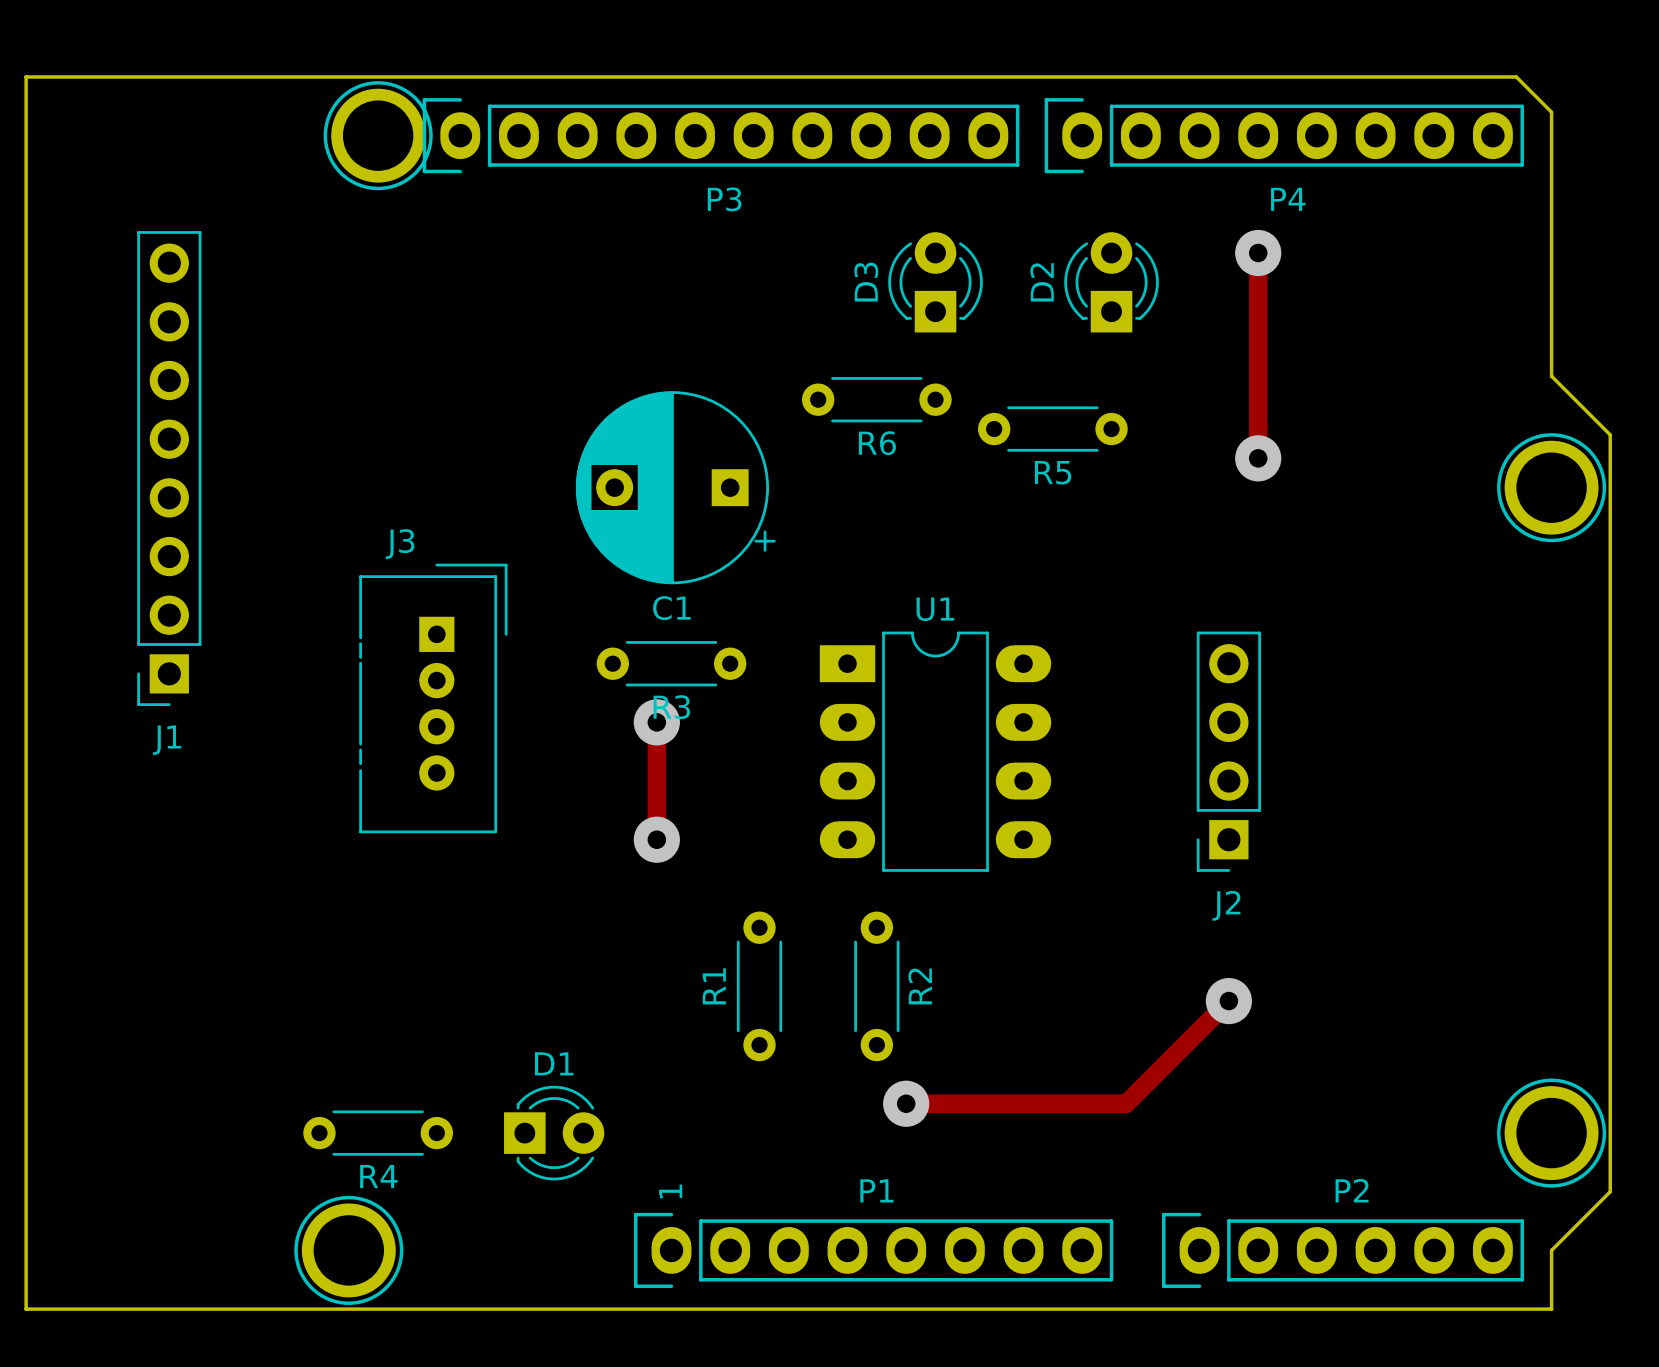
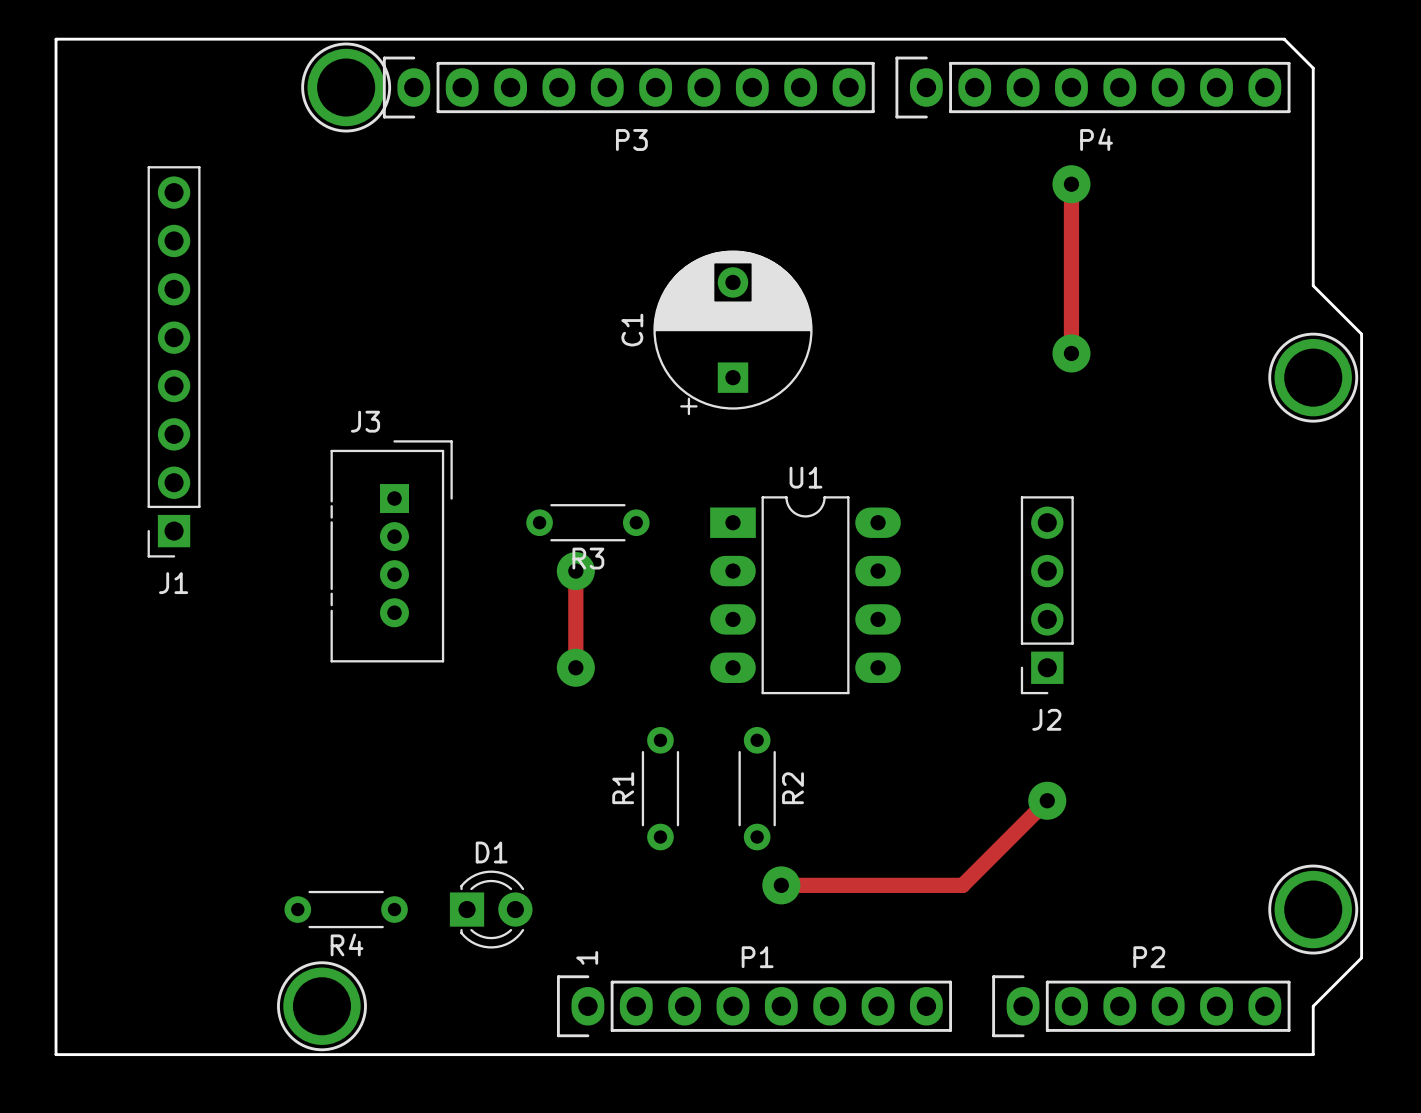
D3: (935, 282) -> none
D2: (1111, 282) -> none
R6: (876, 399) -> none
R5: (1052, 429) -> none
C1 rotation: 0° (675, 487) -> 90° clockwise (732, 332)
C1 position: (675, 487) -> (732, 332)

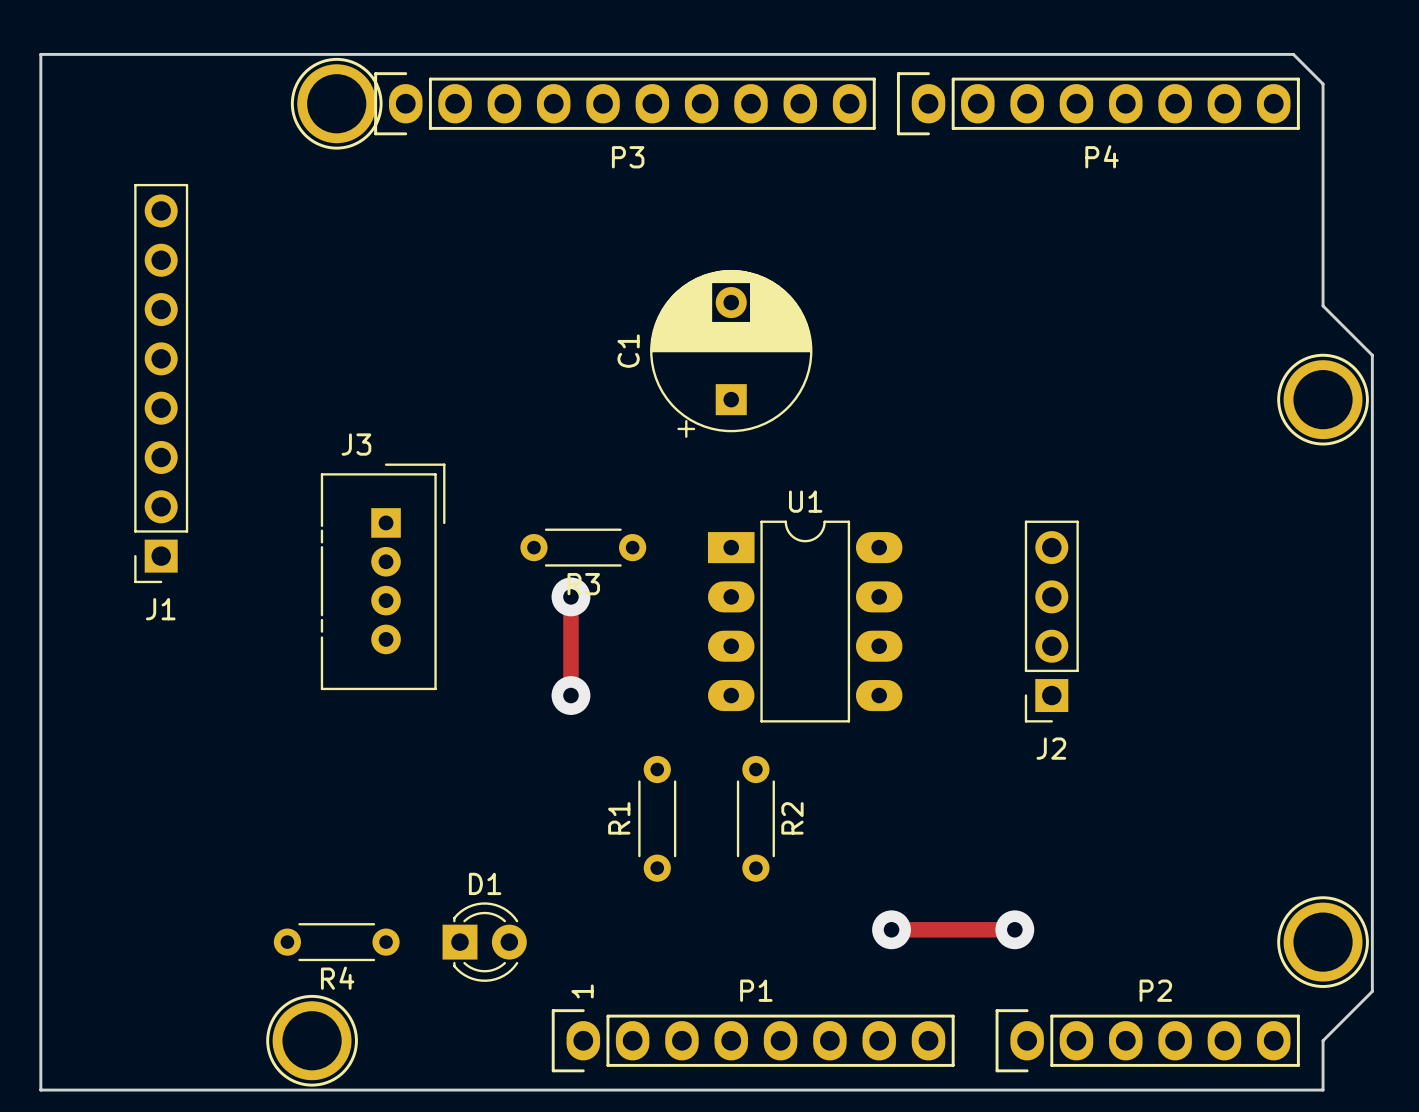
track: (1071, 184) (1071, 353) -> none
via: (1071, 184) -> none
via: (1071, 353) -> none
track: (1047, 800) (962, 885) (781, 885) -> none
via: (1047, 800) -> none
via: (781, 885) -> none
track: none -> (891, 929) (1014, 929)
via: none -> (891, 929)
via: none -> (1014, 929)

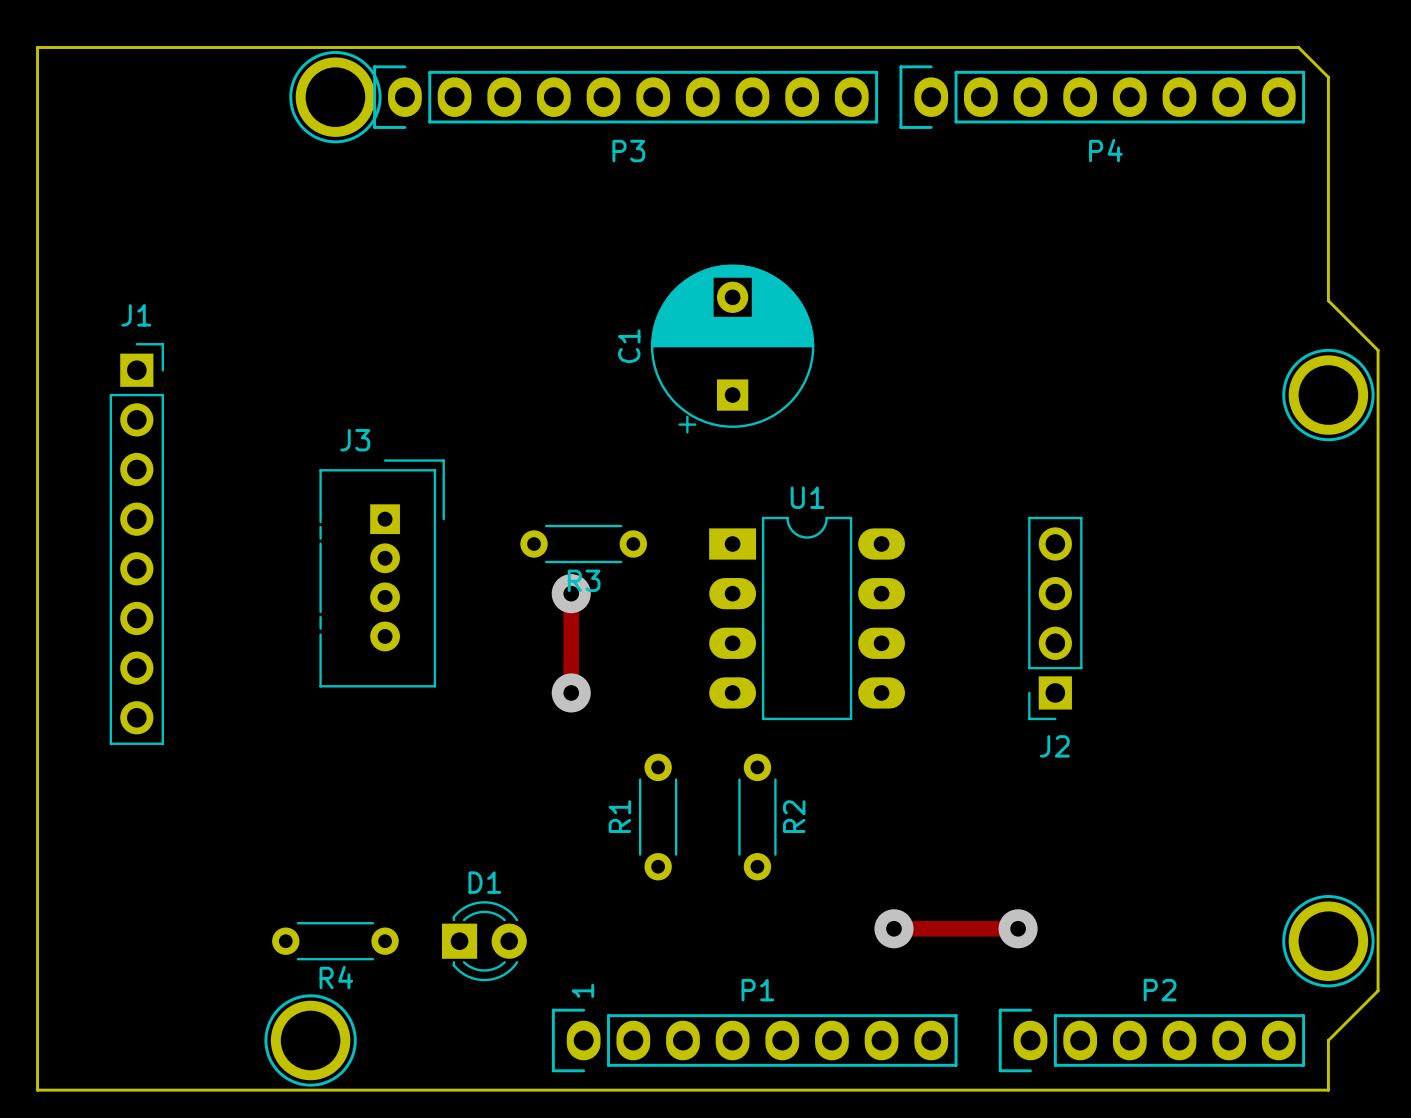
J1 rotation: 0° (161, 383) -> 180° (136, 544)

